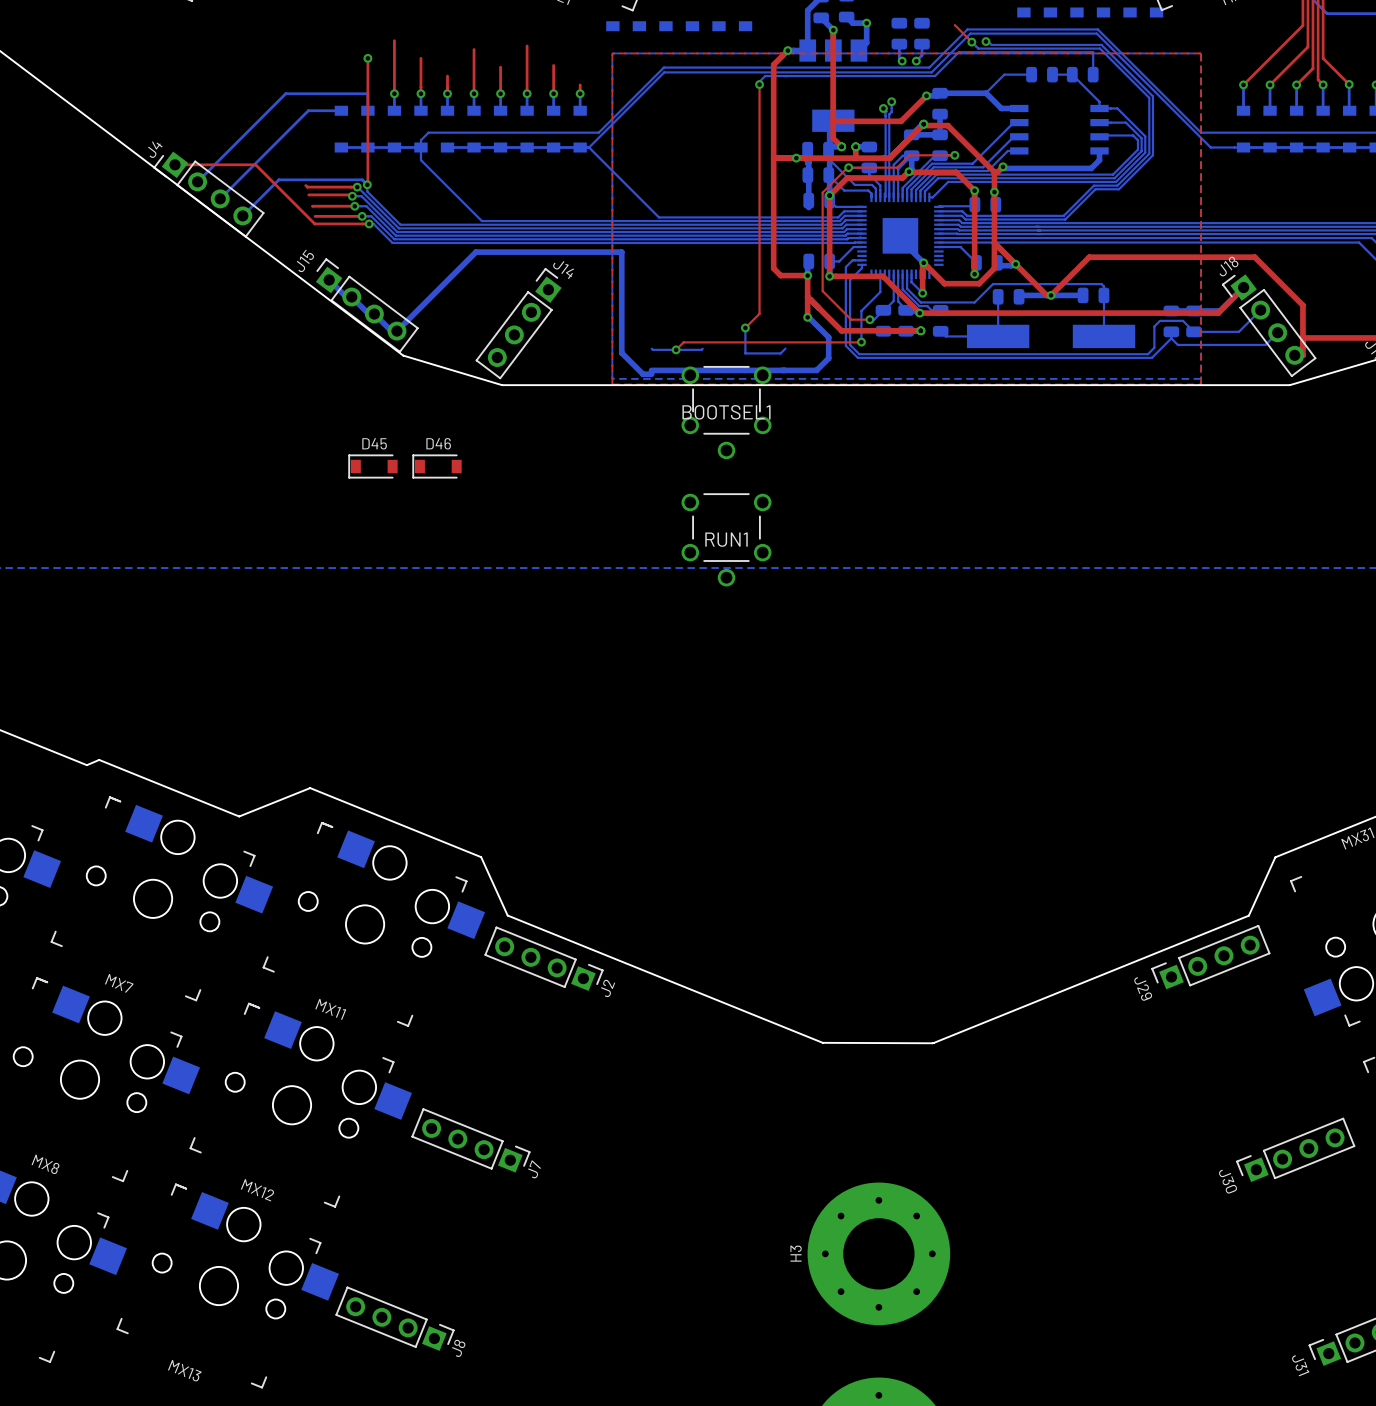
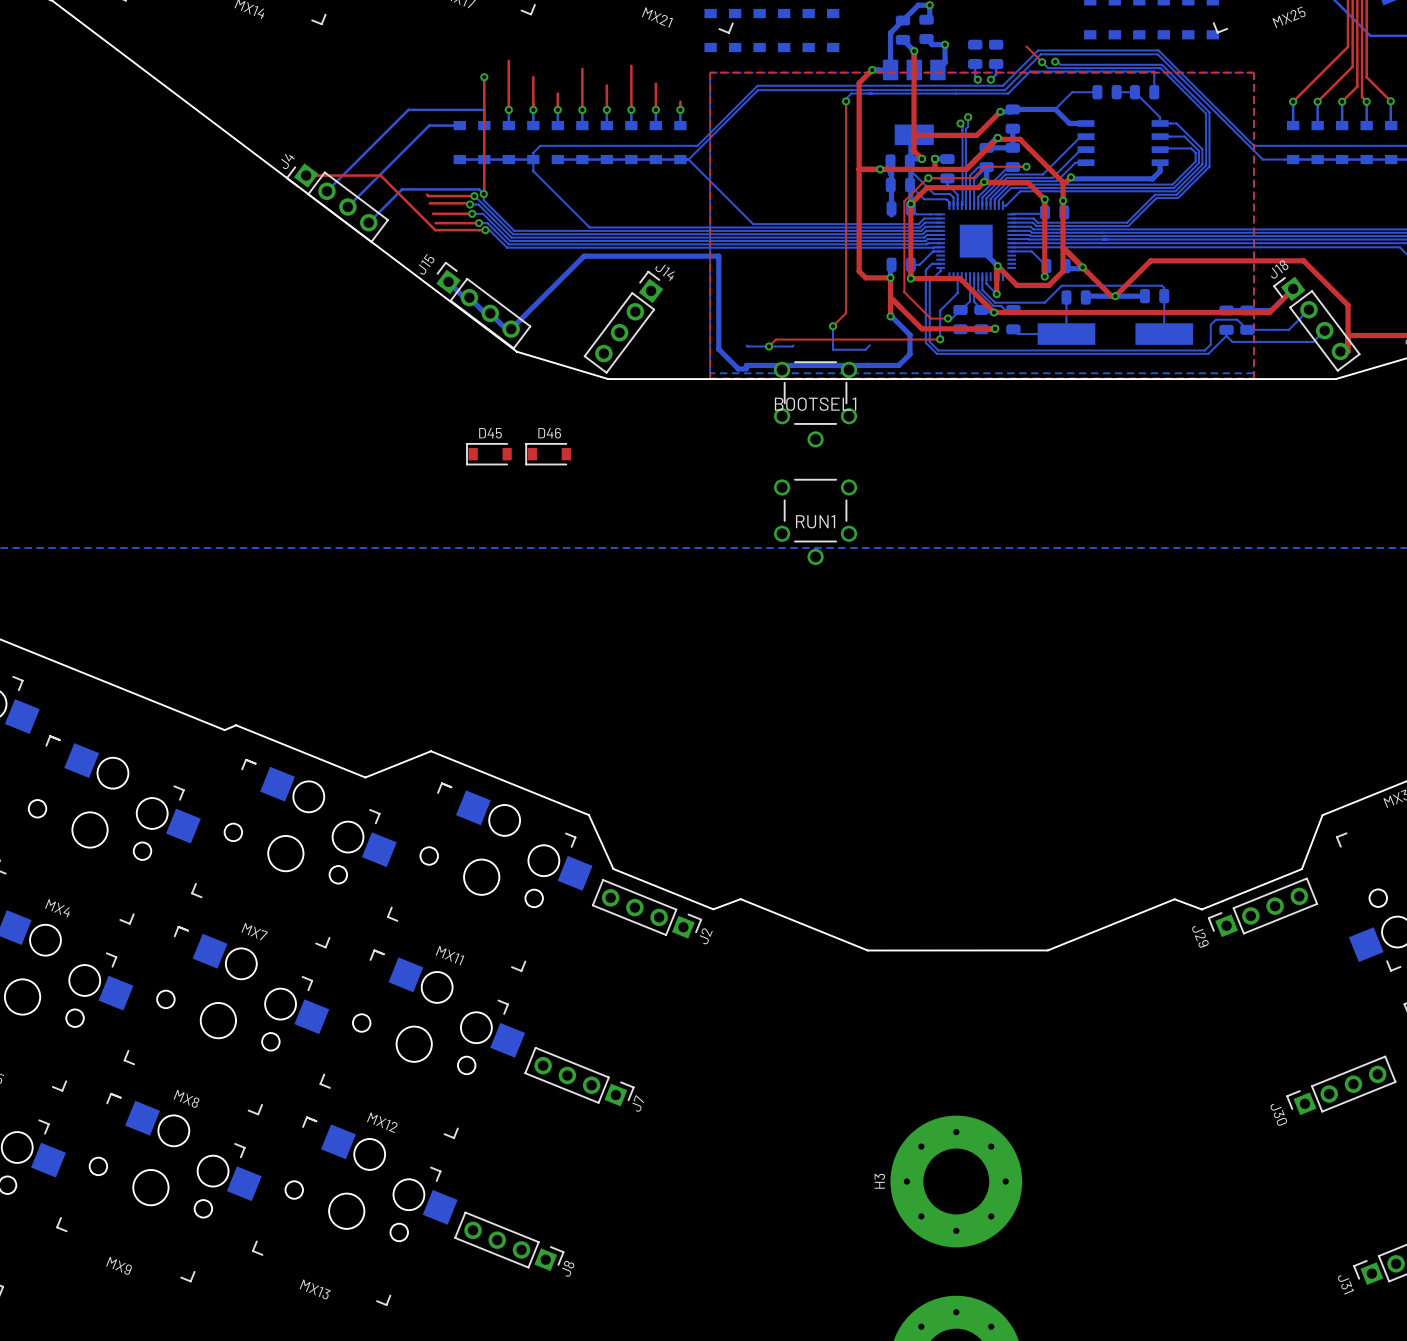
board edge: (1275, 857) (1248, 915) (932, 1043) (822, 1042) (507, 915) -> (1322, 815) (1301, 869) (1201, 909) (1174, 899) (1047, 950) (867, 950) (740, 899) (713, 909) (613, 868)

